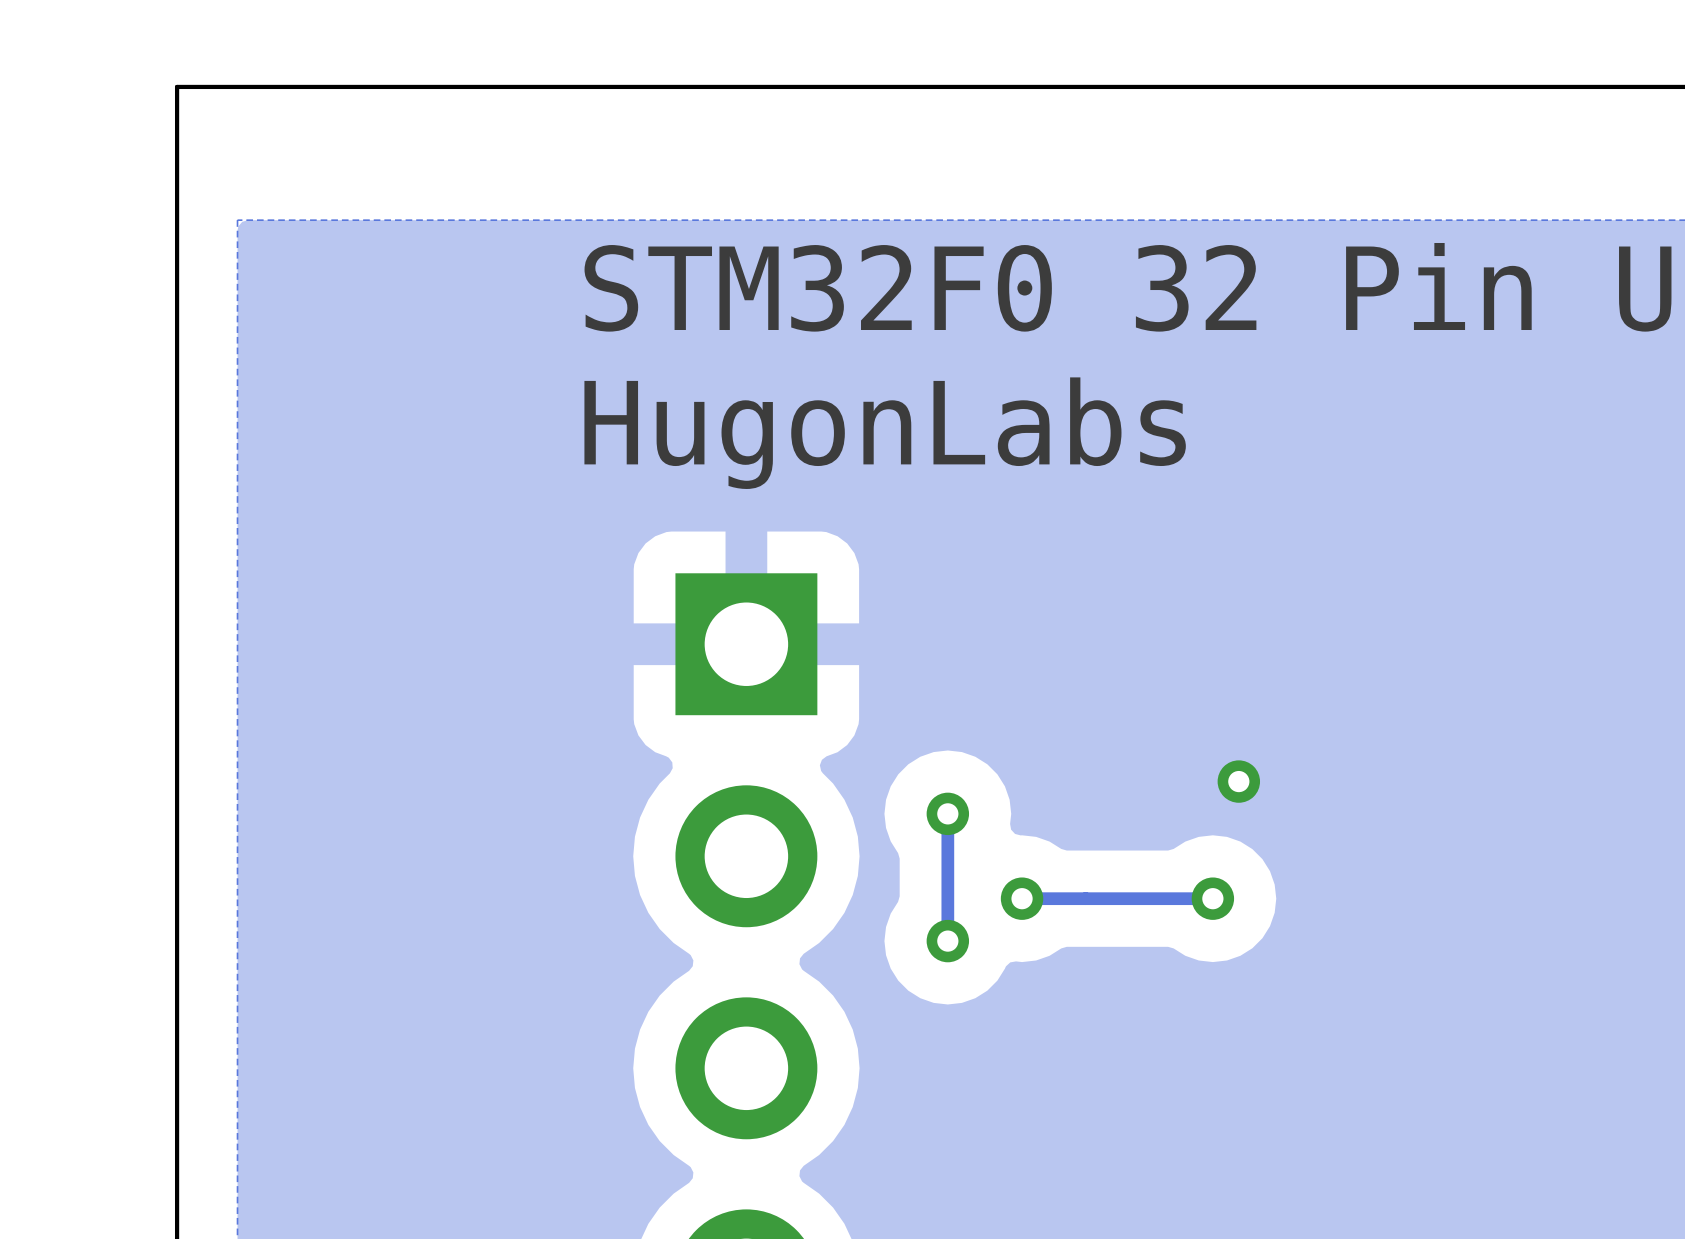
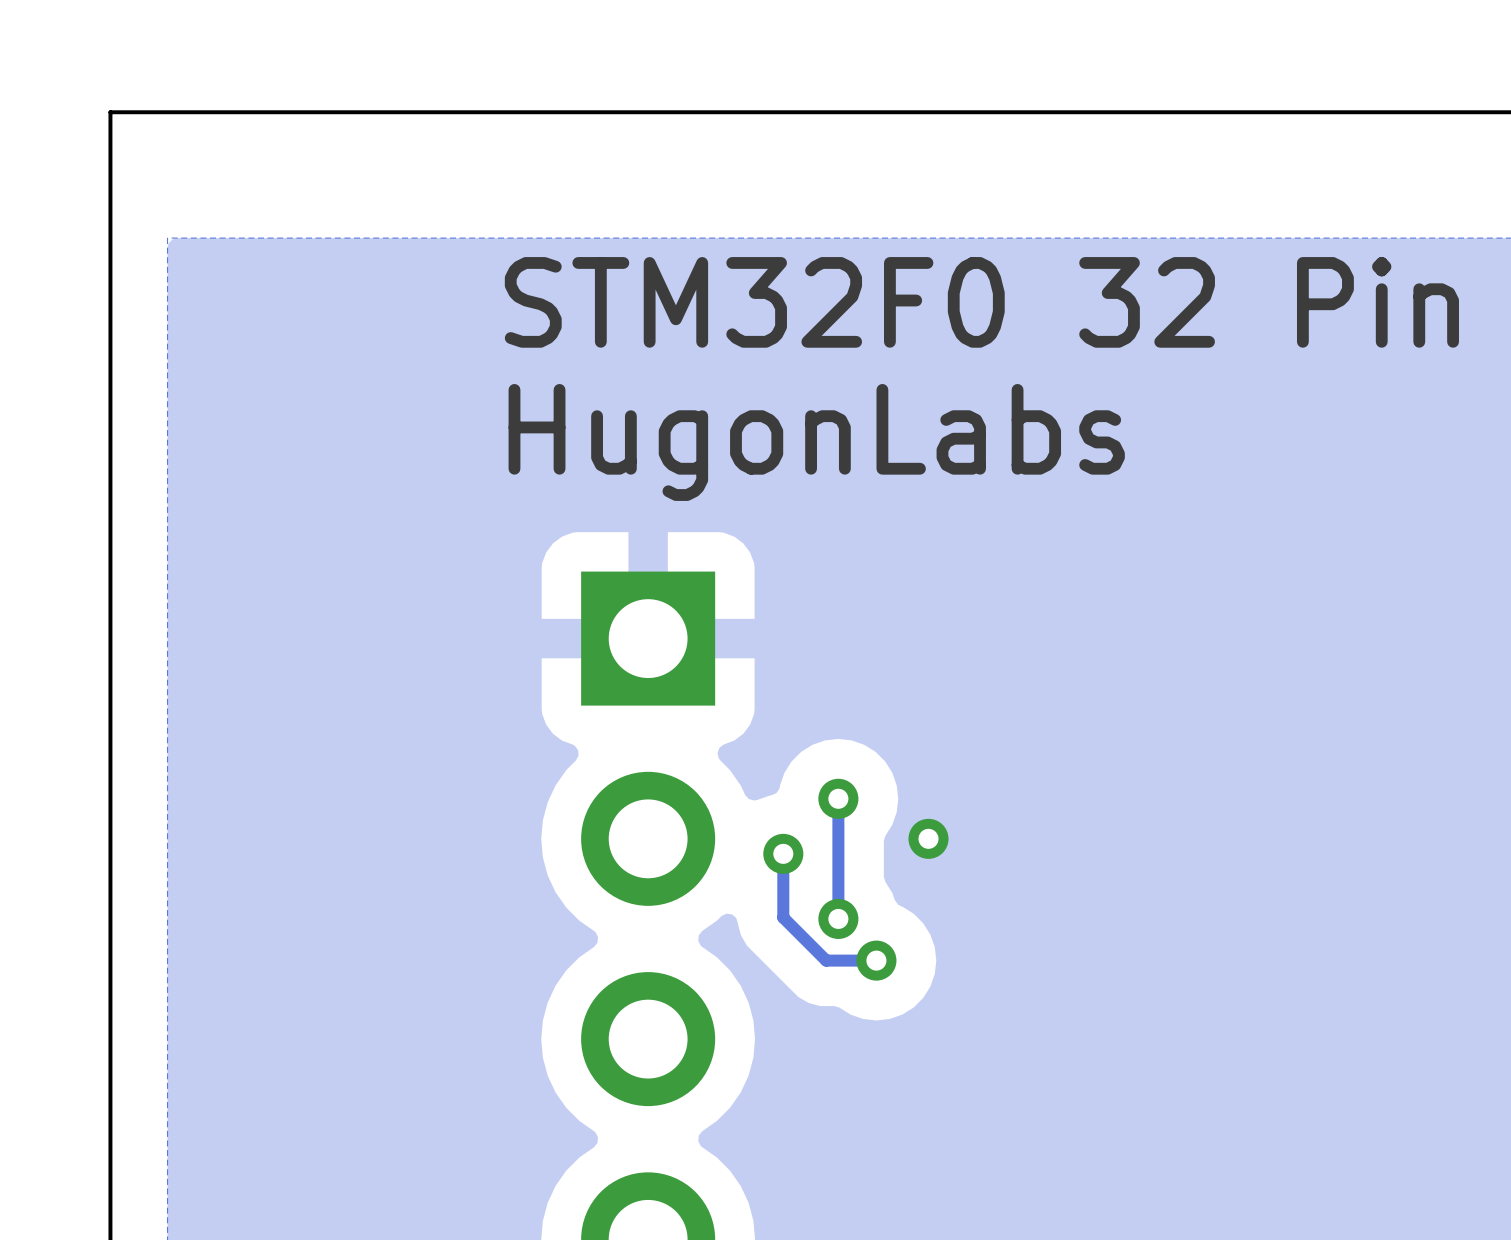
via: (1238, 781) -> none
track: none -> (783, 853) (783, 917) (826, 960) (876, 960)
via: none -> (783, 853)
via position: (1022, 898) -> (928, 838)
track: (1212, 898) (1022, 898) -> none
via: (1212, 898) -> none
via: none -> (876, 960)

